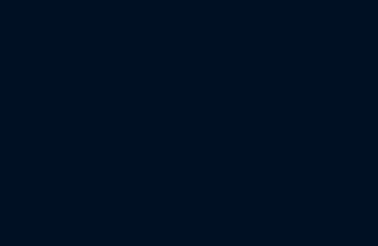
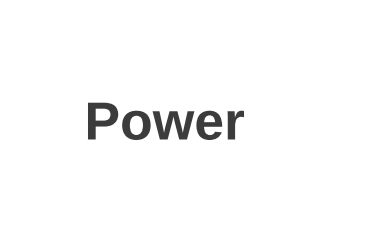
text: none -> Power (166, 121)

